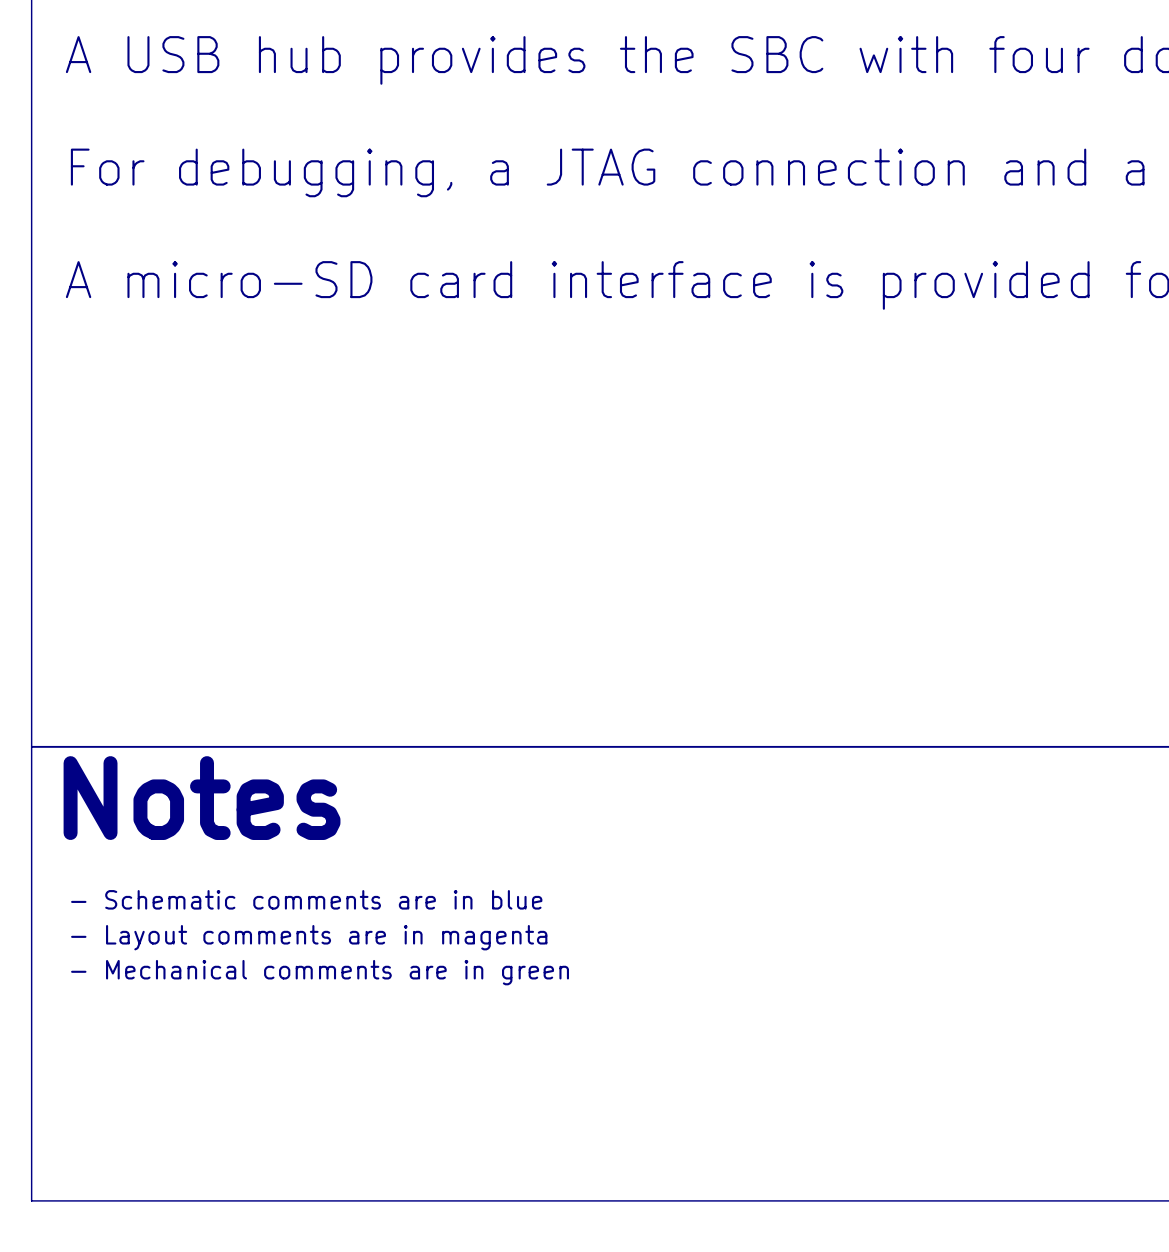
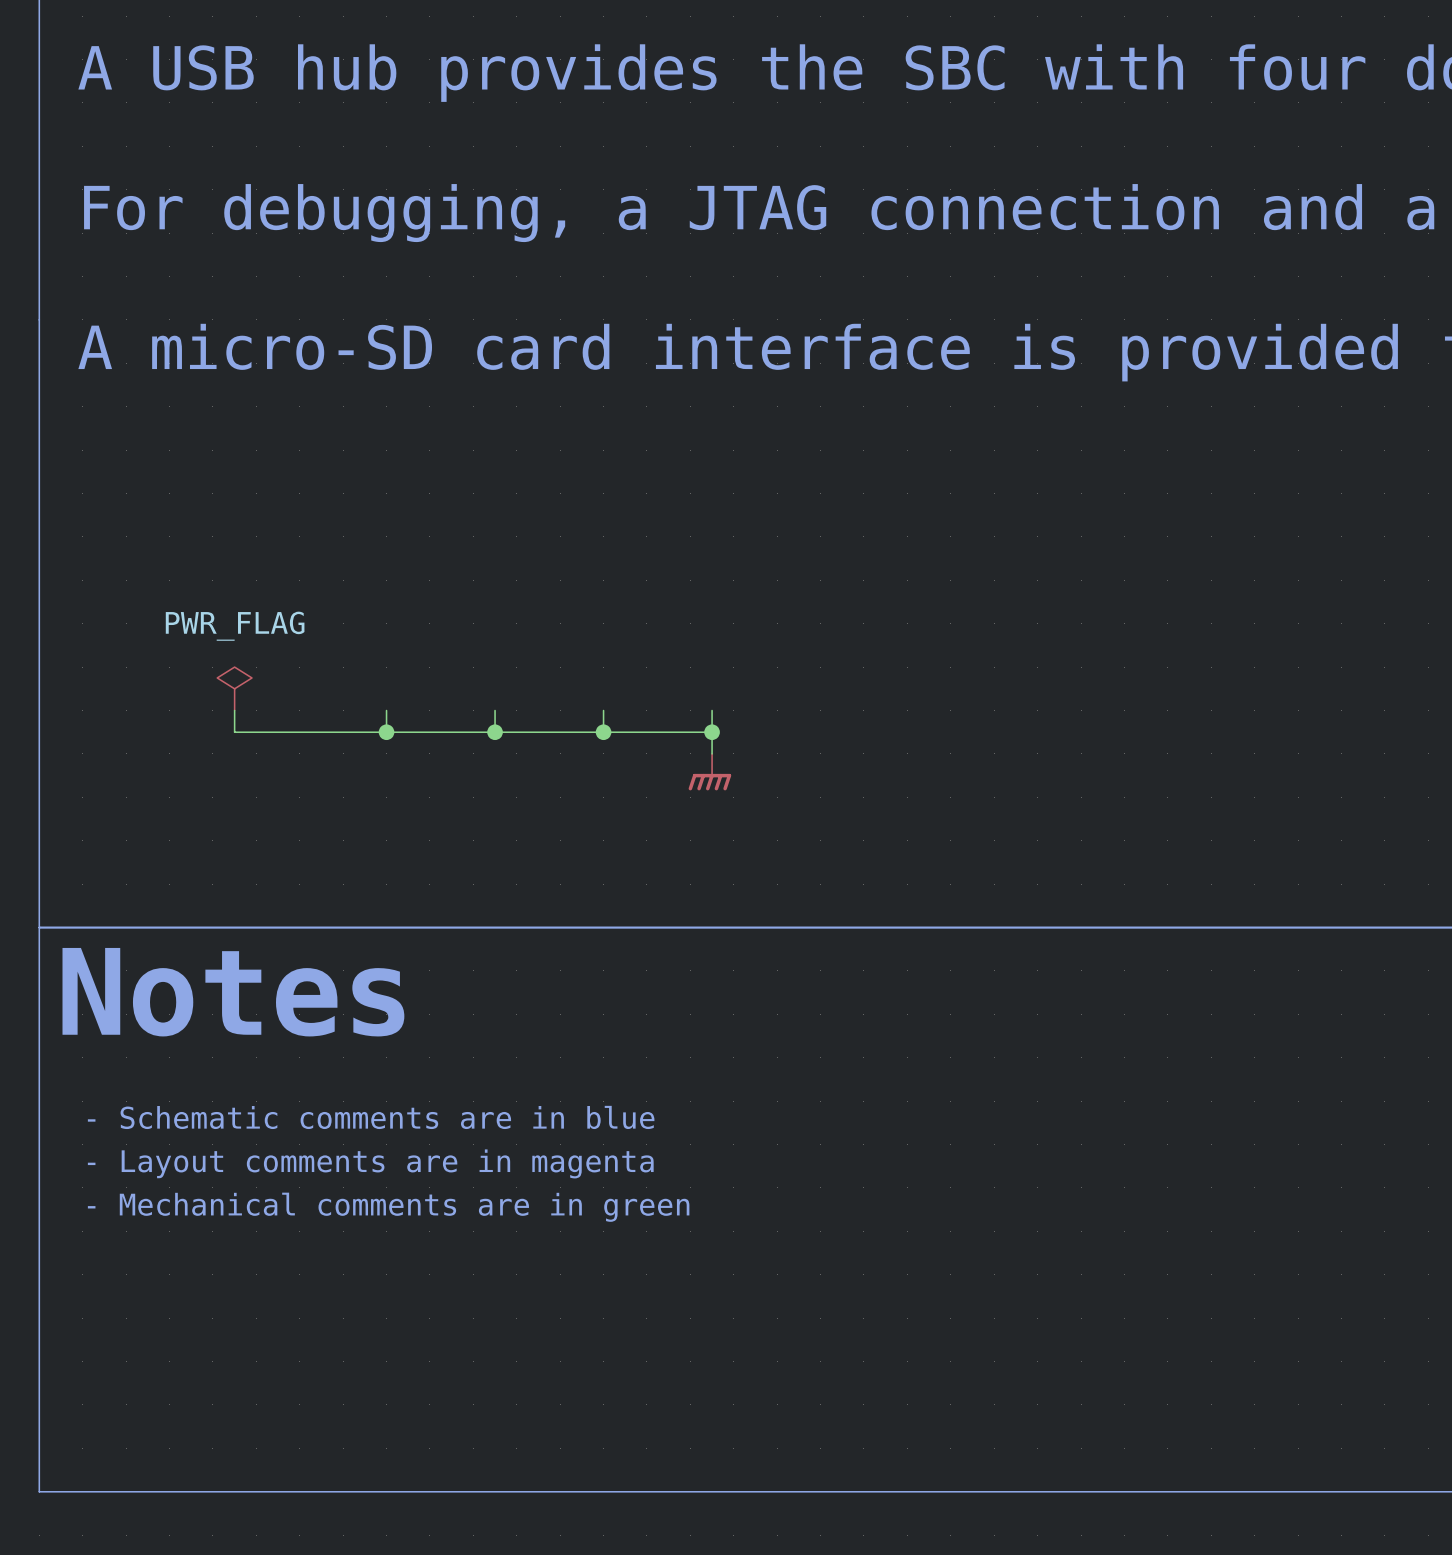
power symbol: none -> PWR_FLAG (234, 688)
wire: none -> (234, 710) (234, 732) (712, 732)
wire: none -> (386, 710) (386, 732)
wire: none -> (495, 710) (495, 732)
wire: none -> (603, 710) (603, 732)
wire: none -> (712, 710) (712, 753)
junction: none -> (386, 732)
junction: none -> (495, 732)
junction: none -> (603, 732)
junction: none -> (712, 732)
power symbol: none -> (709, 772)

